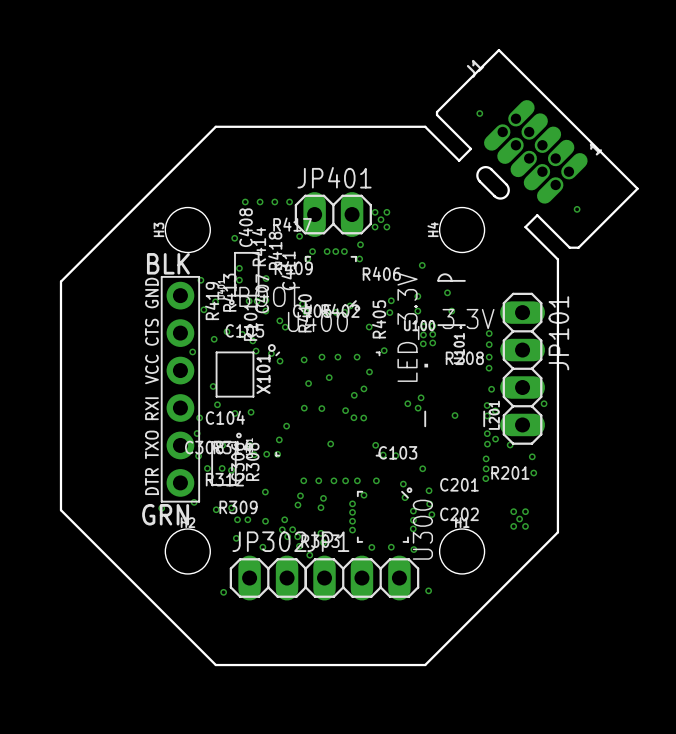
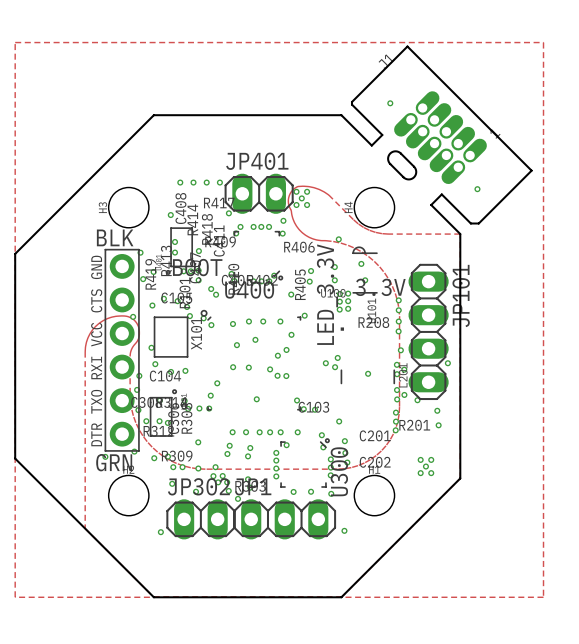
zone outline: none -> (15, 42) (543, 42) (543, 597) (15, 597) (15, 42)
zone outline: none -> (153, 597) (85, 528) (85, 346) (89, 333) (99, 323) (111, 317) (123, 315) (131, 318) (137, 323) (138, 337) (131, 349) (130, 356) (130, 401) (133, 415) (138, 429) (152, 447) (169, 460) (183, 465) (205, 469) (351, 467) (364, 463) (381, 450) (390, 440) (396, 427) (399, 407) (399, 316) (395, 293) (388, 279) (379, 266) (362, 252) (340, 243) (313, 238) (299, 229) (292, 218) (288, 198) (294, 188) (303, 186) (324, 191) (358, 223) (375, 232) (460, 234) (460, 478) (341, 597)

